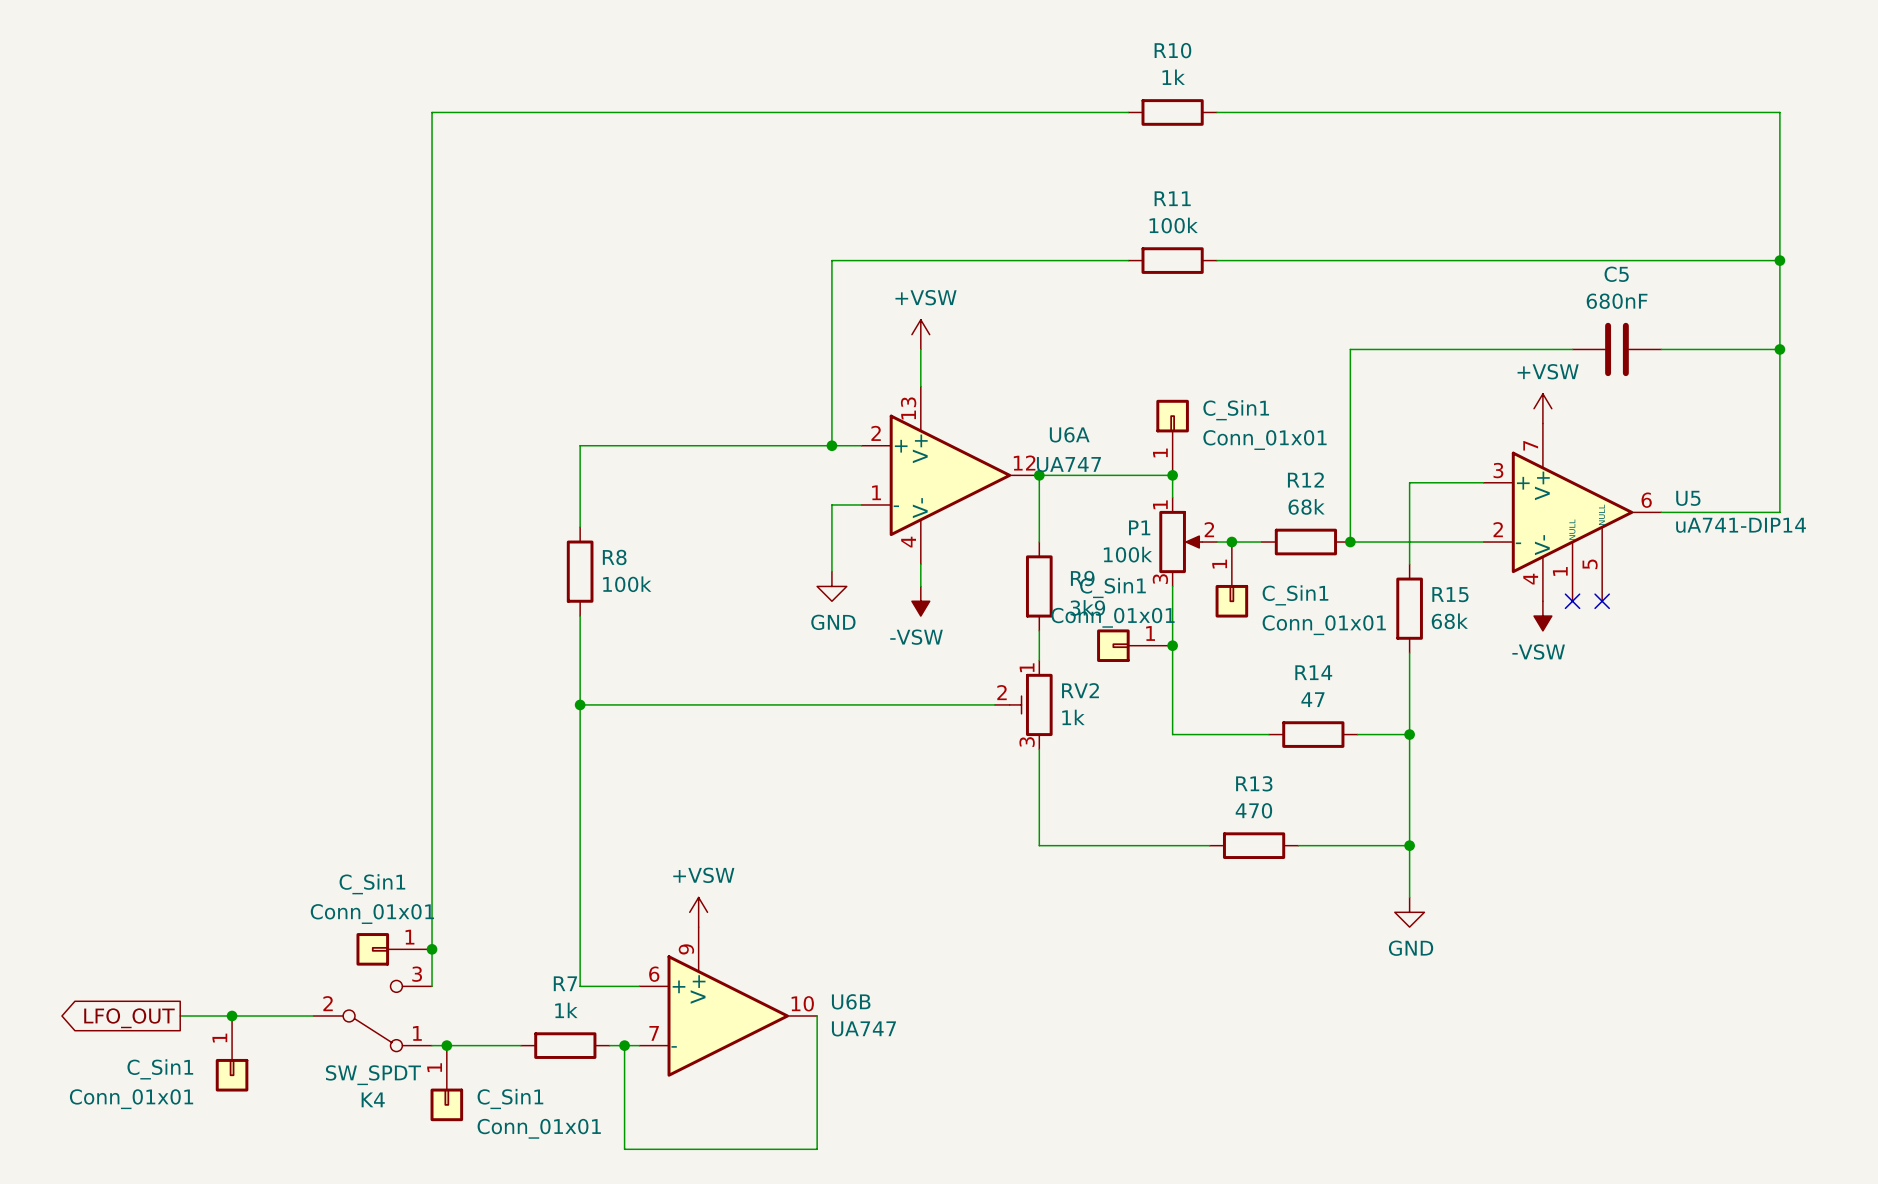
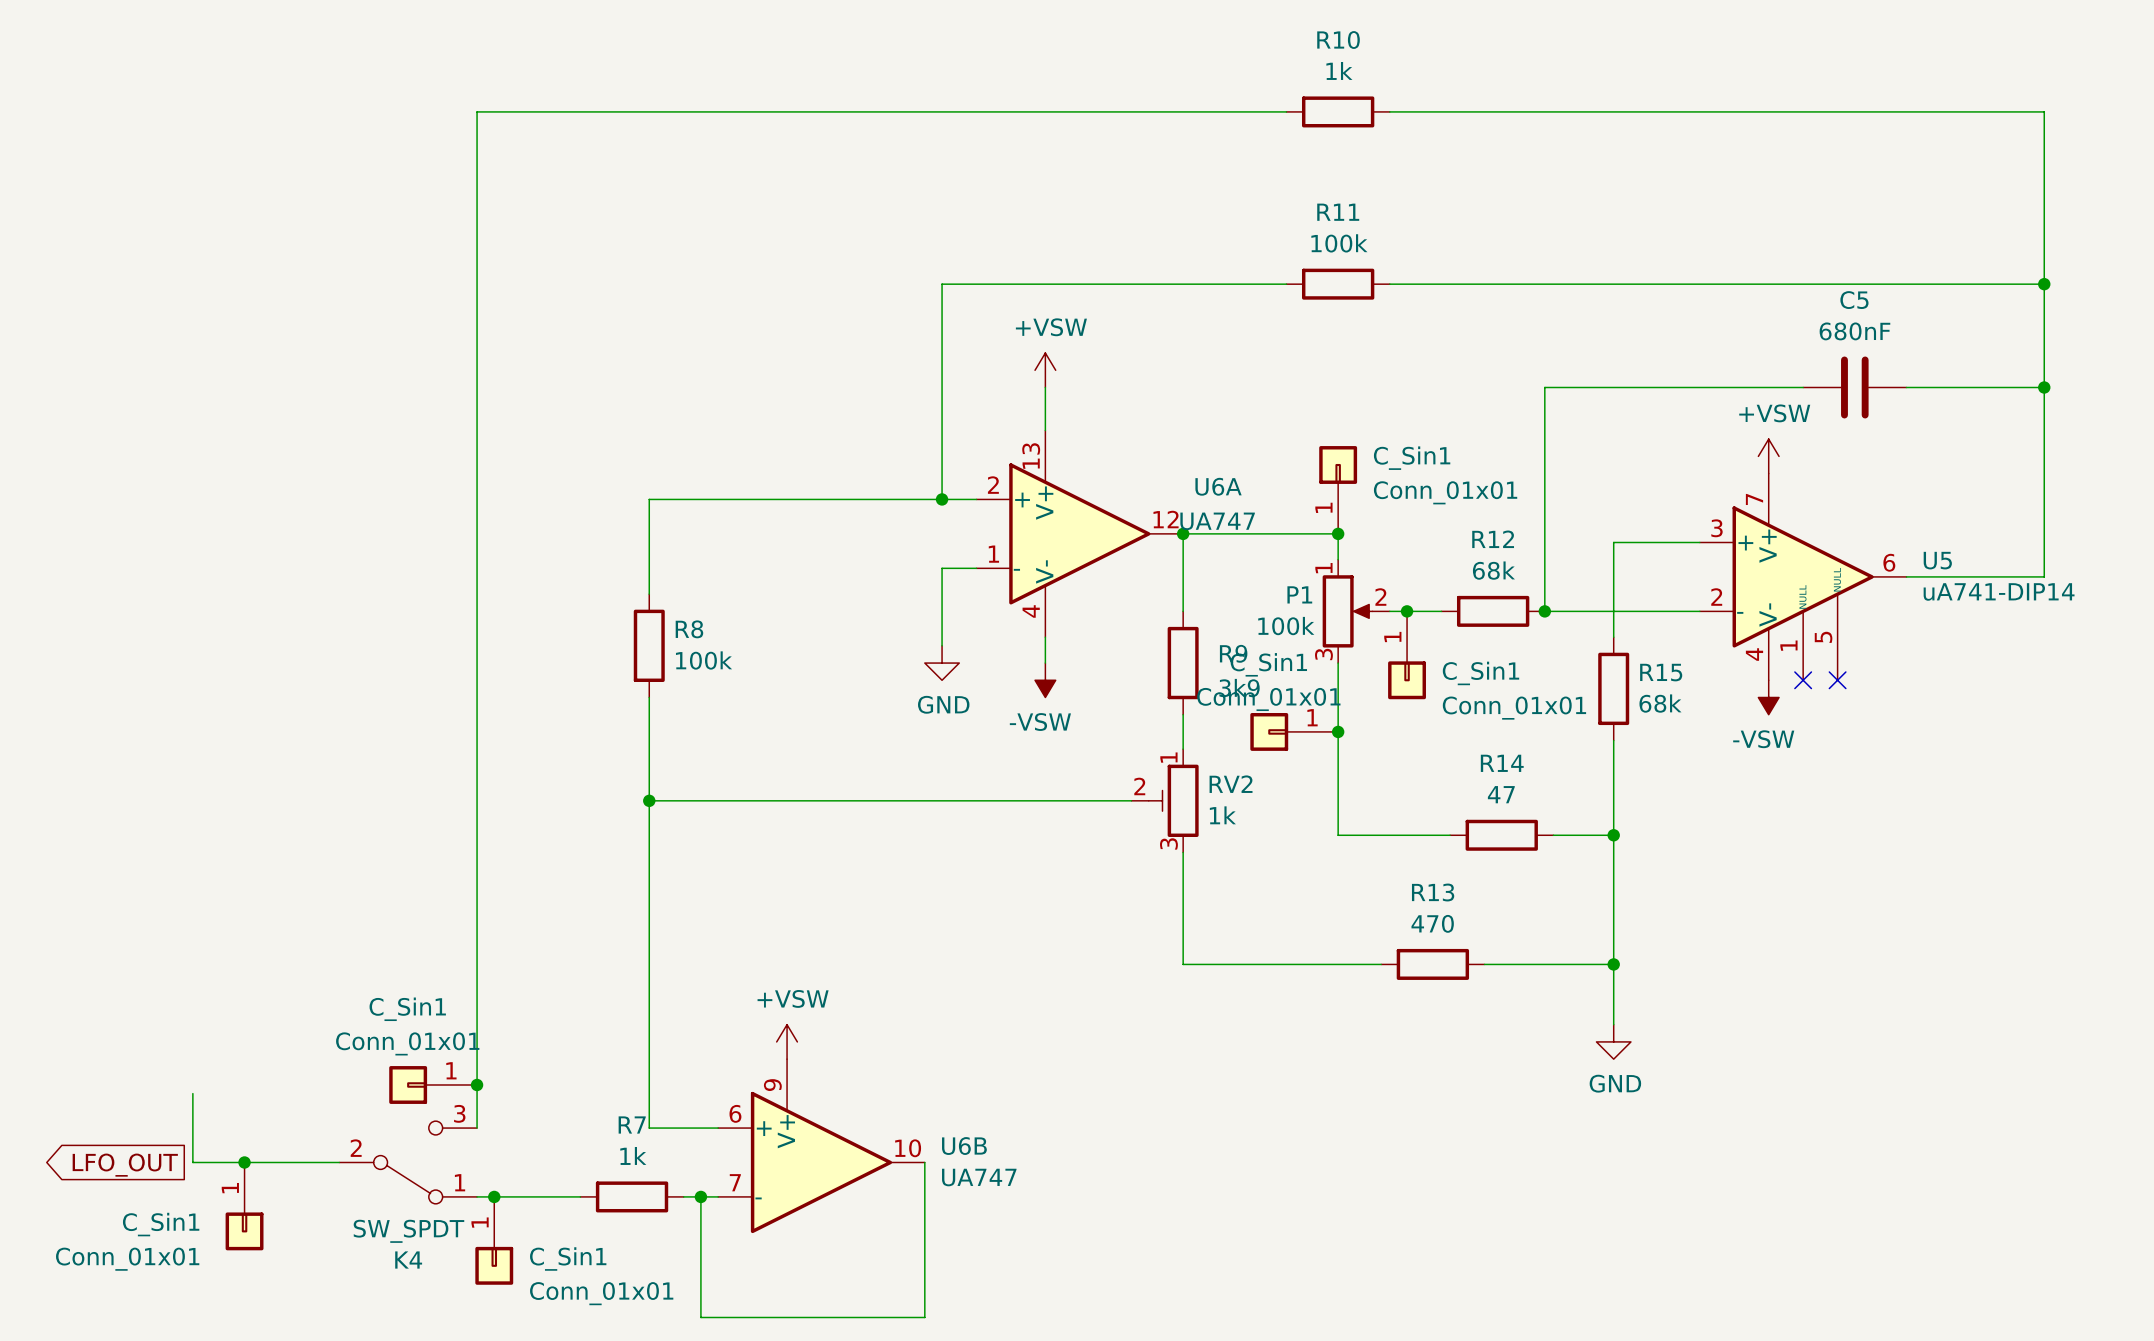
wire: (180, 1016) (187, 1016) -> (192, 1093) (192, 1162)

